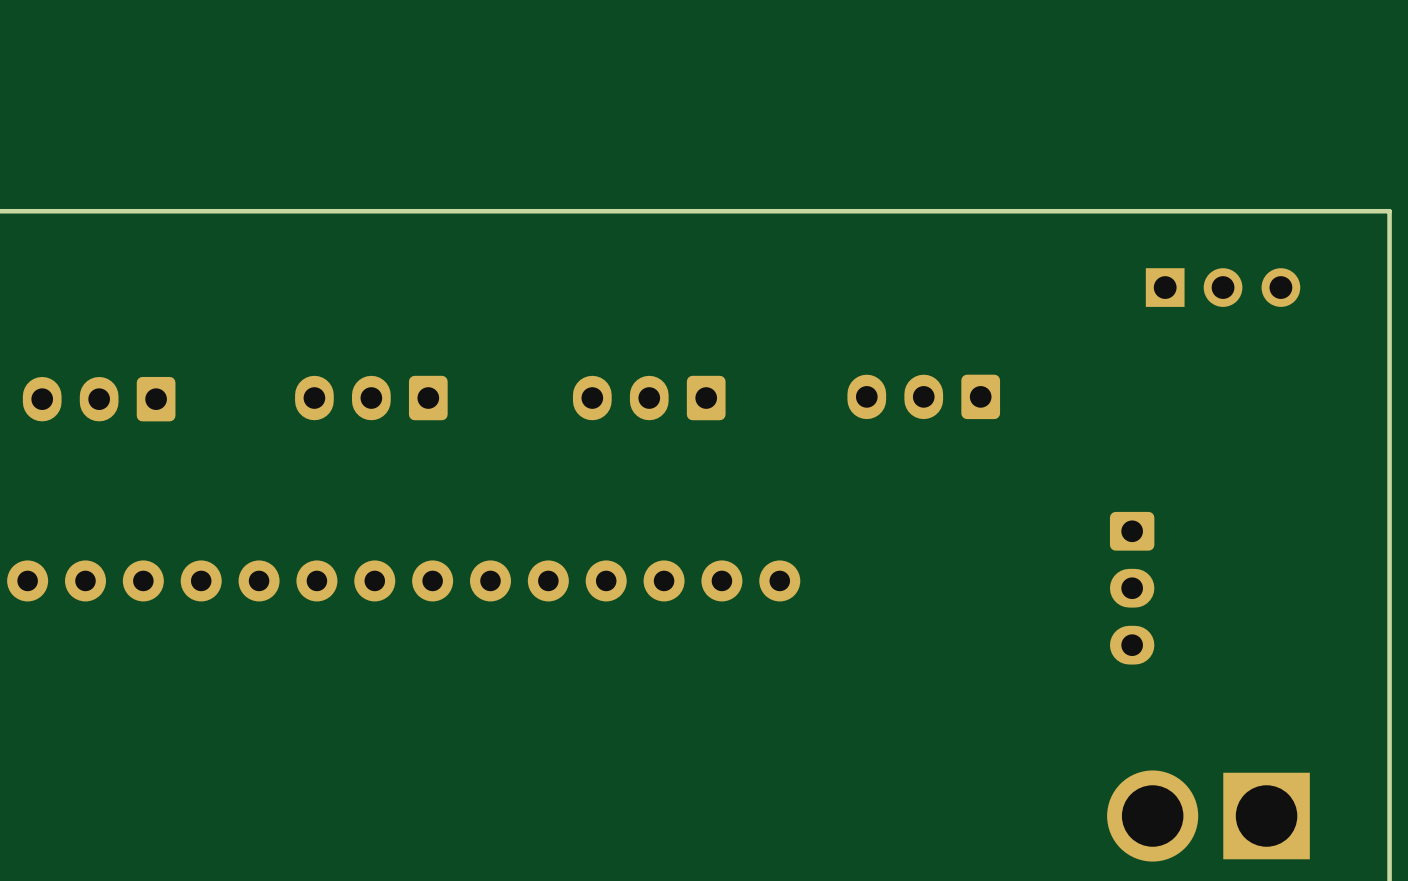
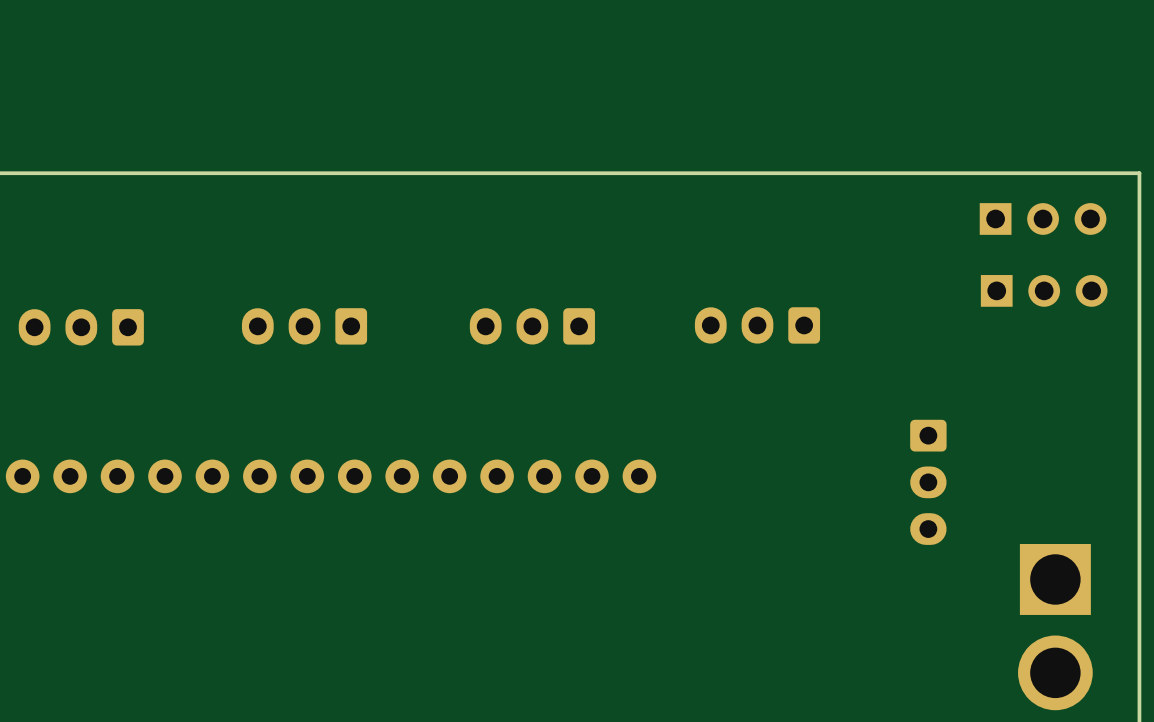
part: none -> (1043, 218)
part: (1223, 287) -> none
part: none -> (1044, 290)
part rotation: 0° (1208, 816) -> 90° counterclockwise (1055, 627)

